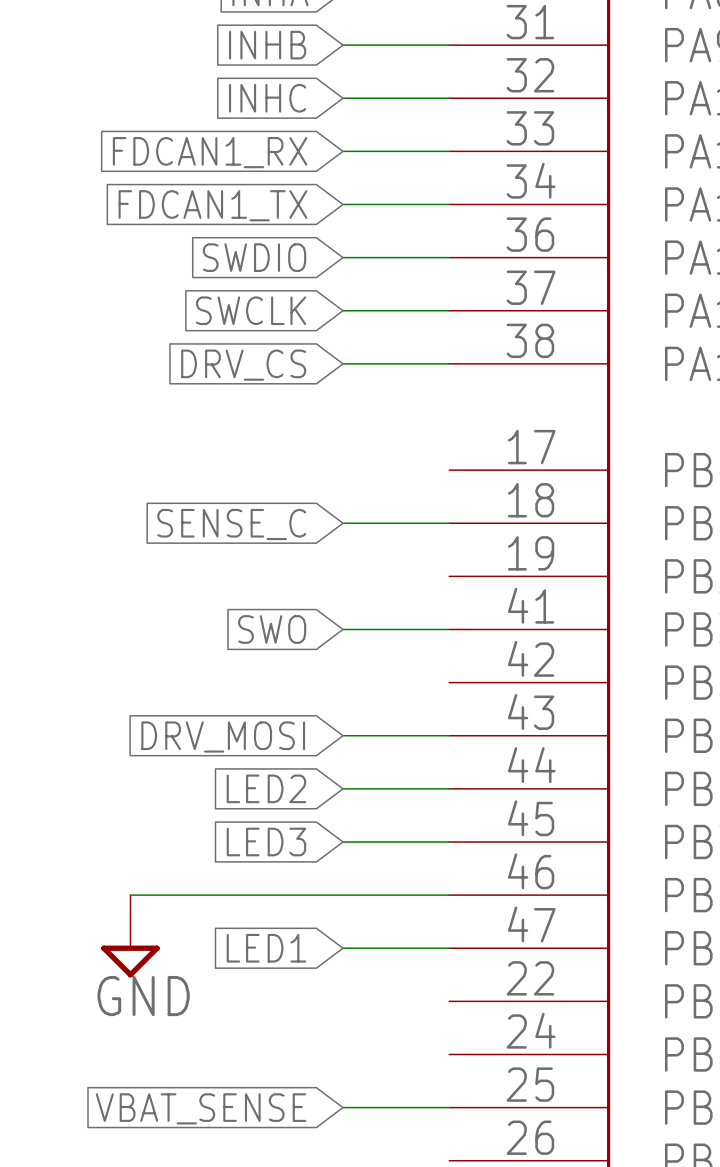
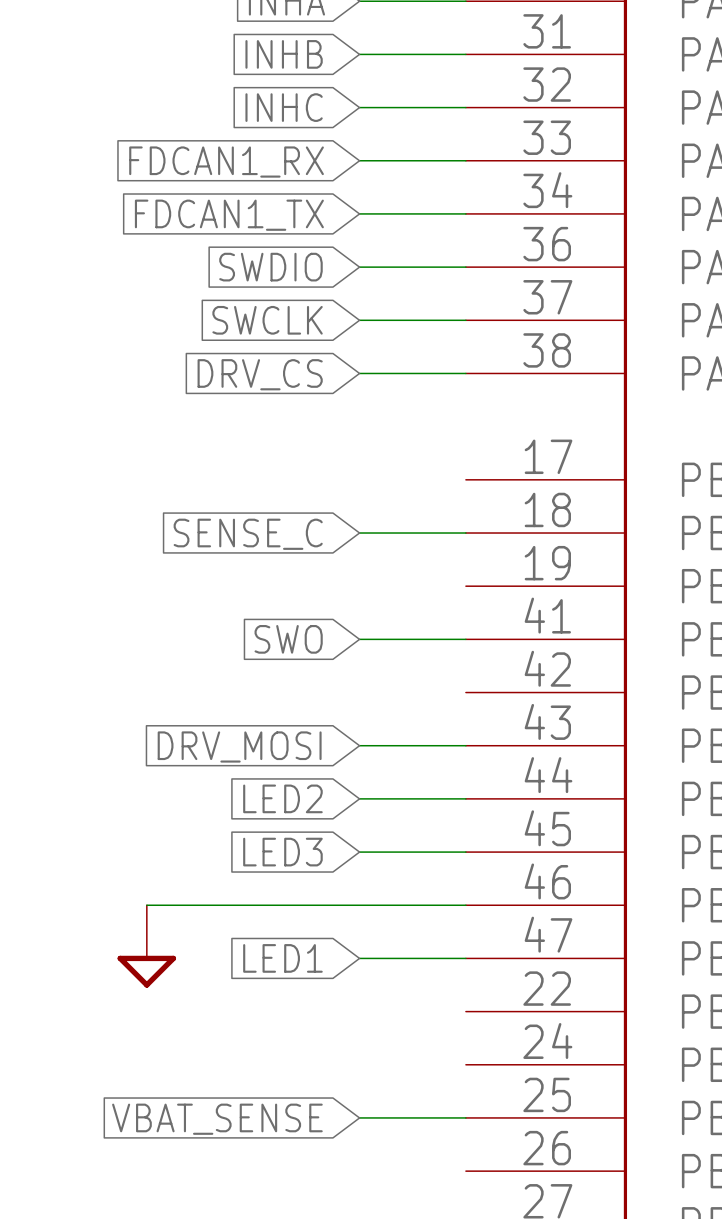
power symbol text: GND (143, 996) -> none

